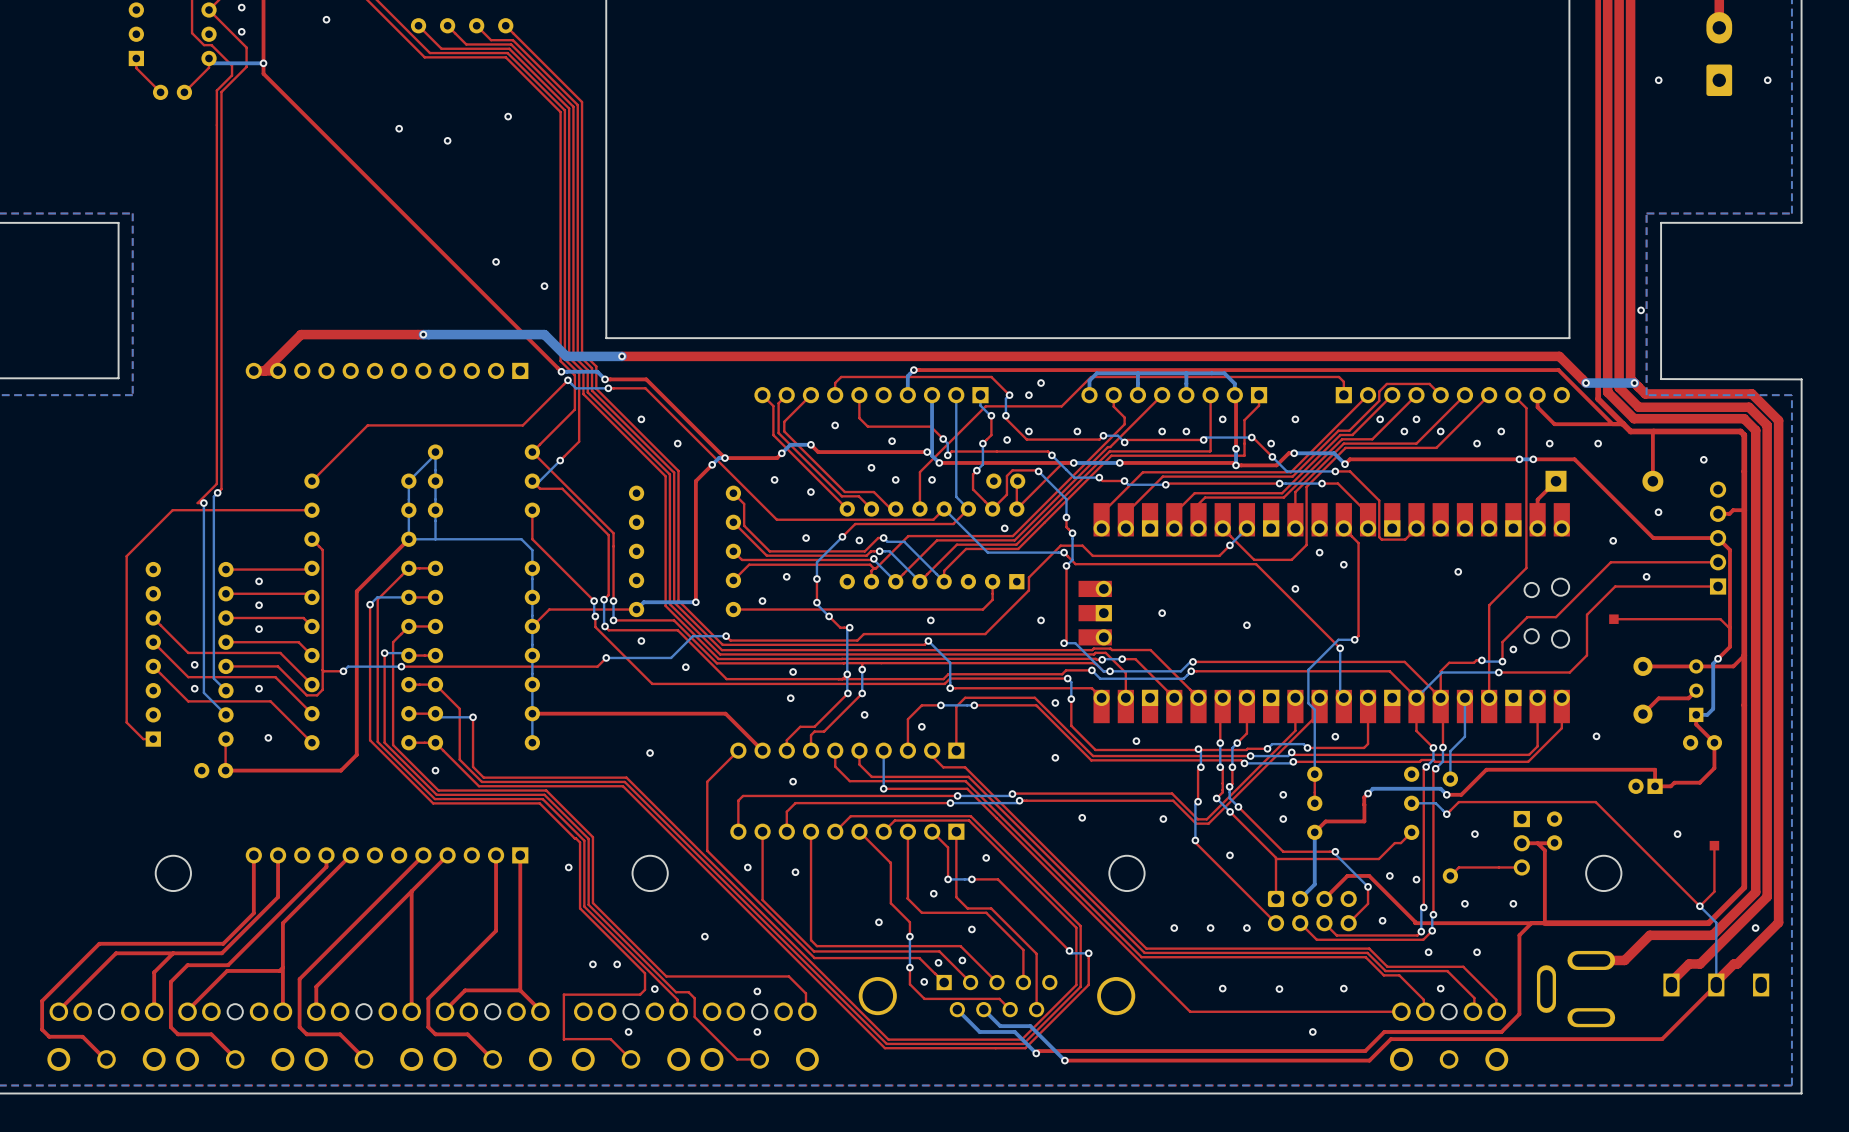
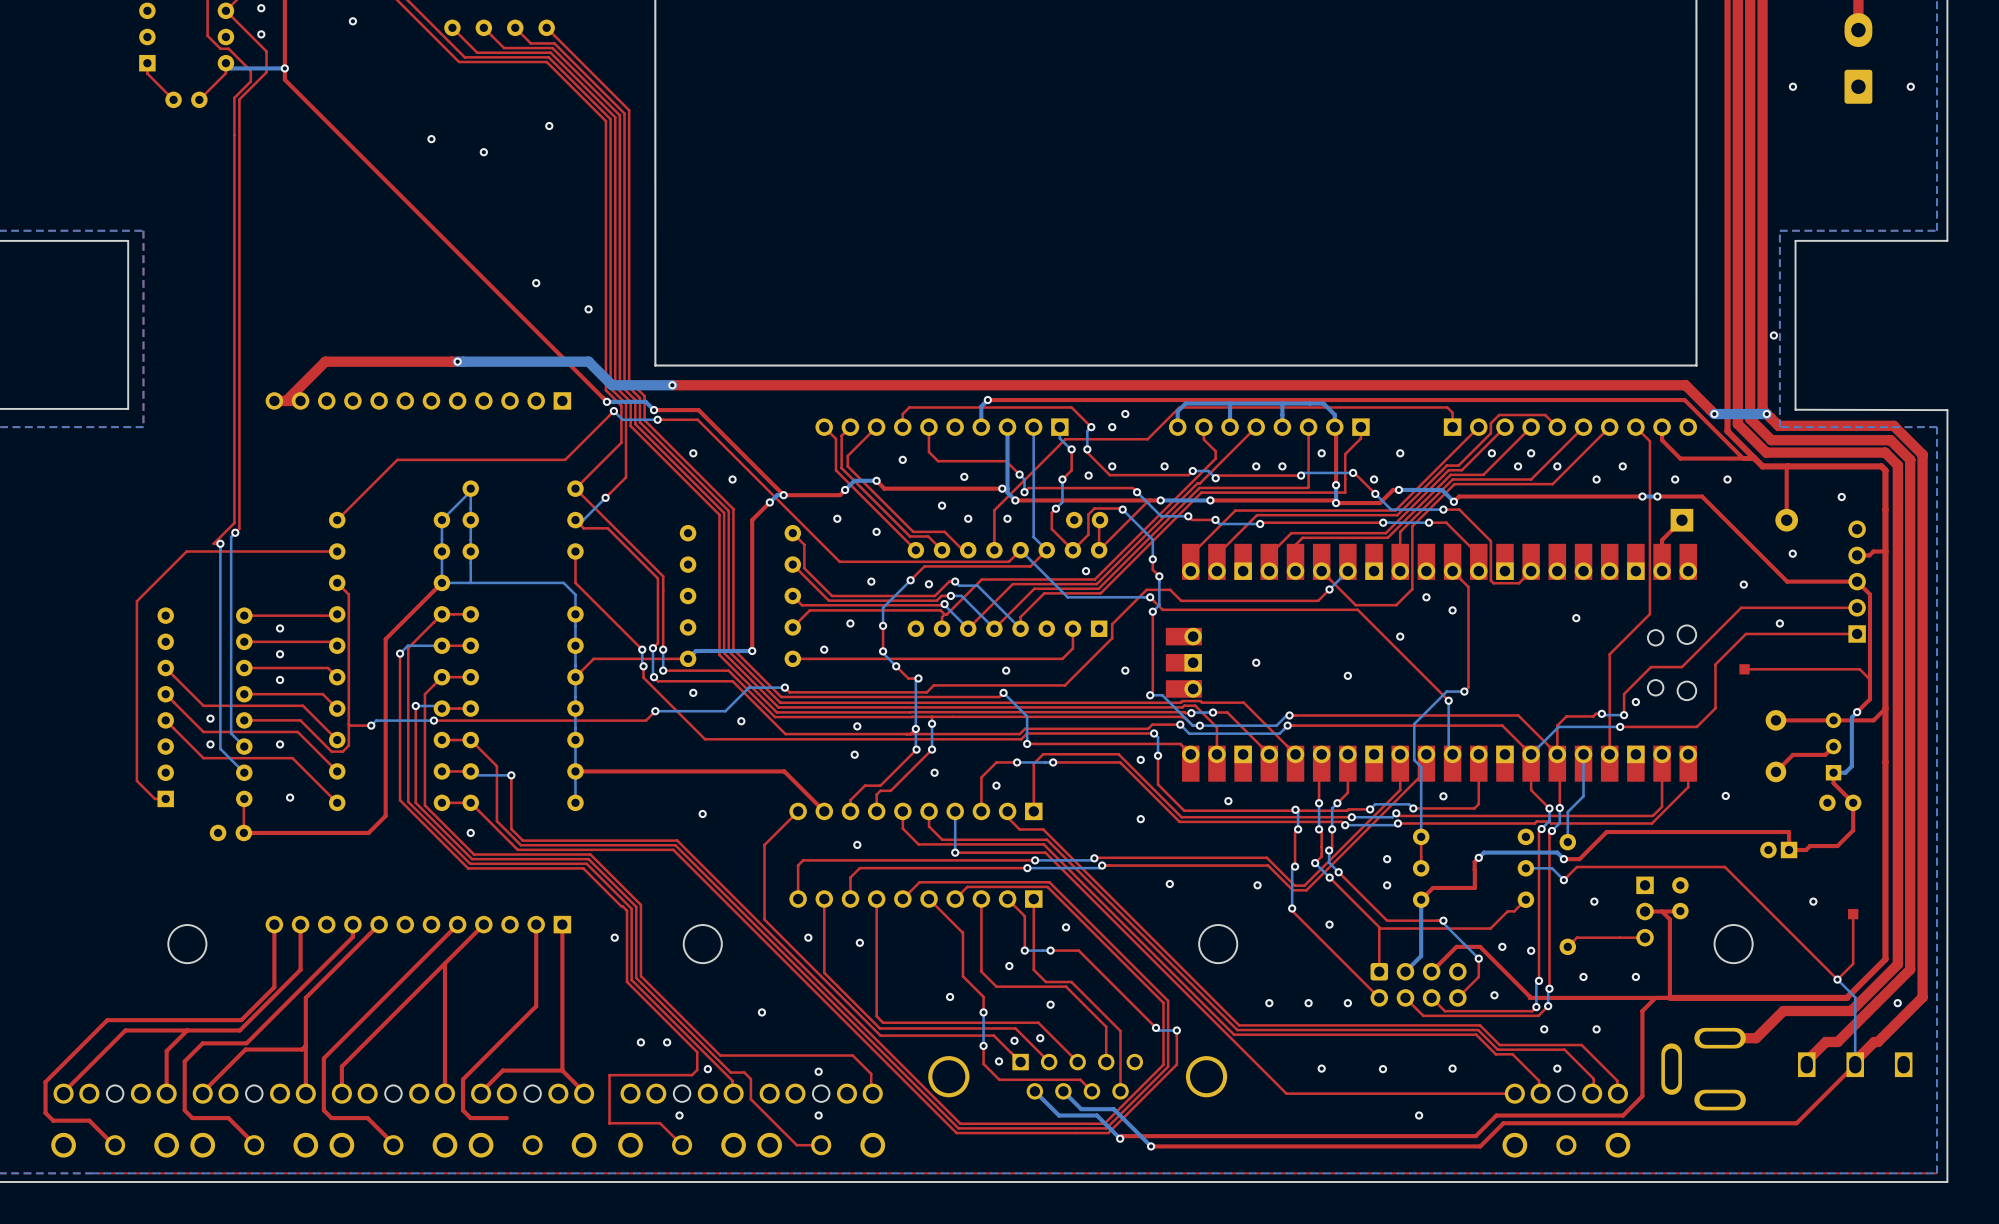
top track: (467, 1034) (492, 1059) -> (505, 1118) (506, 1118)

